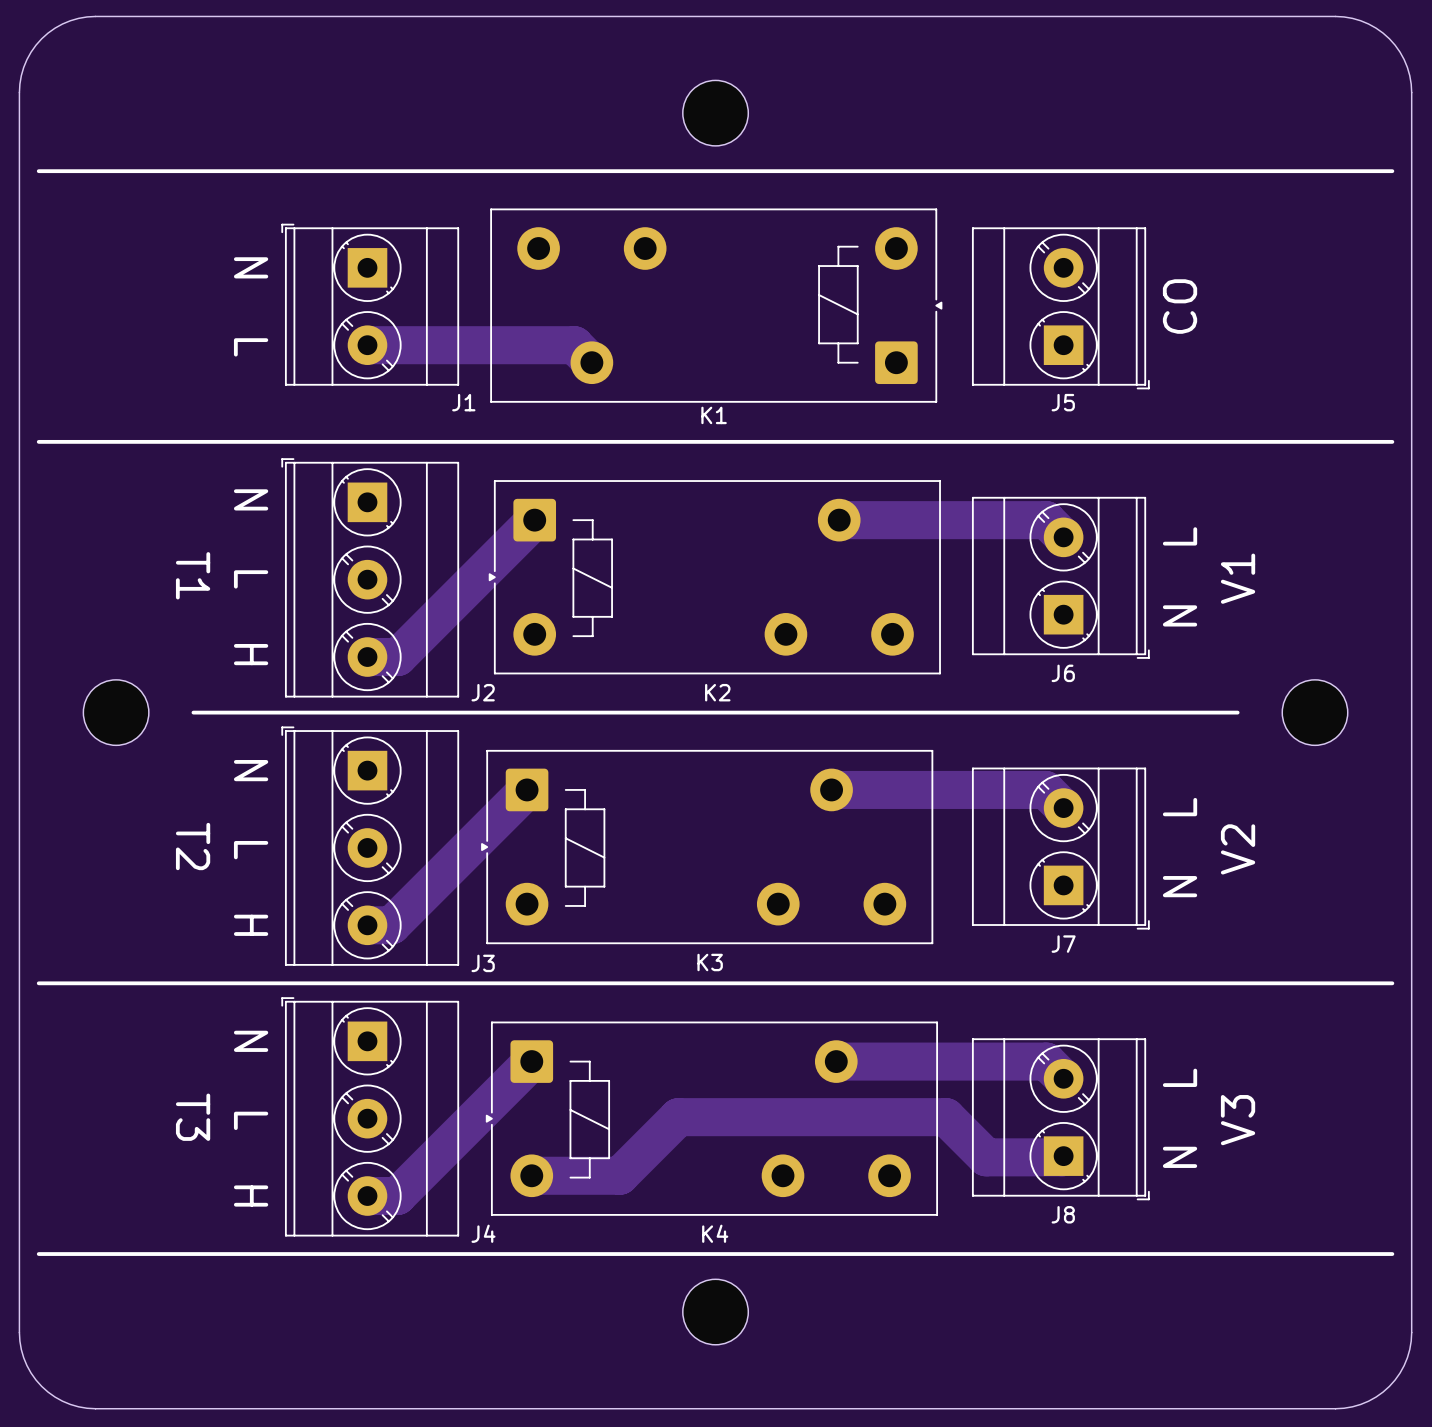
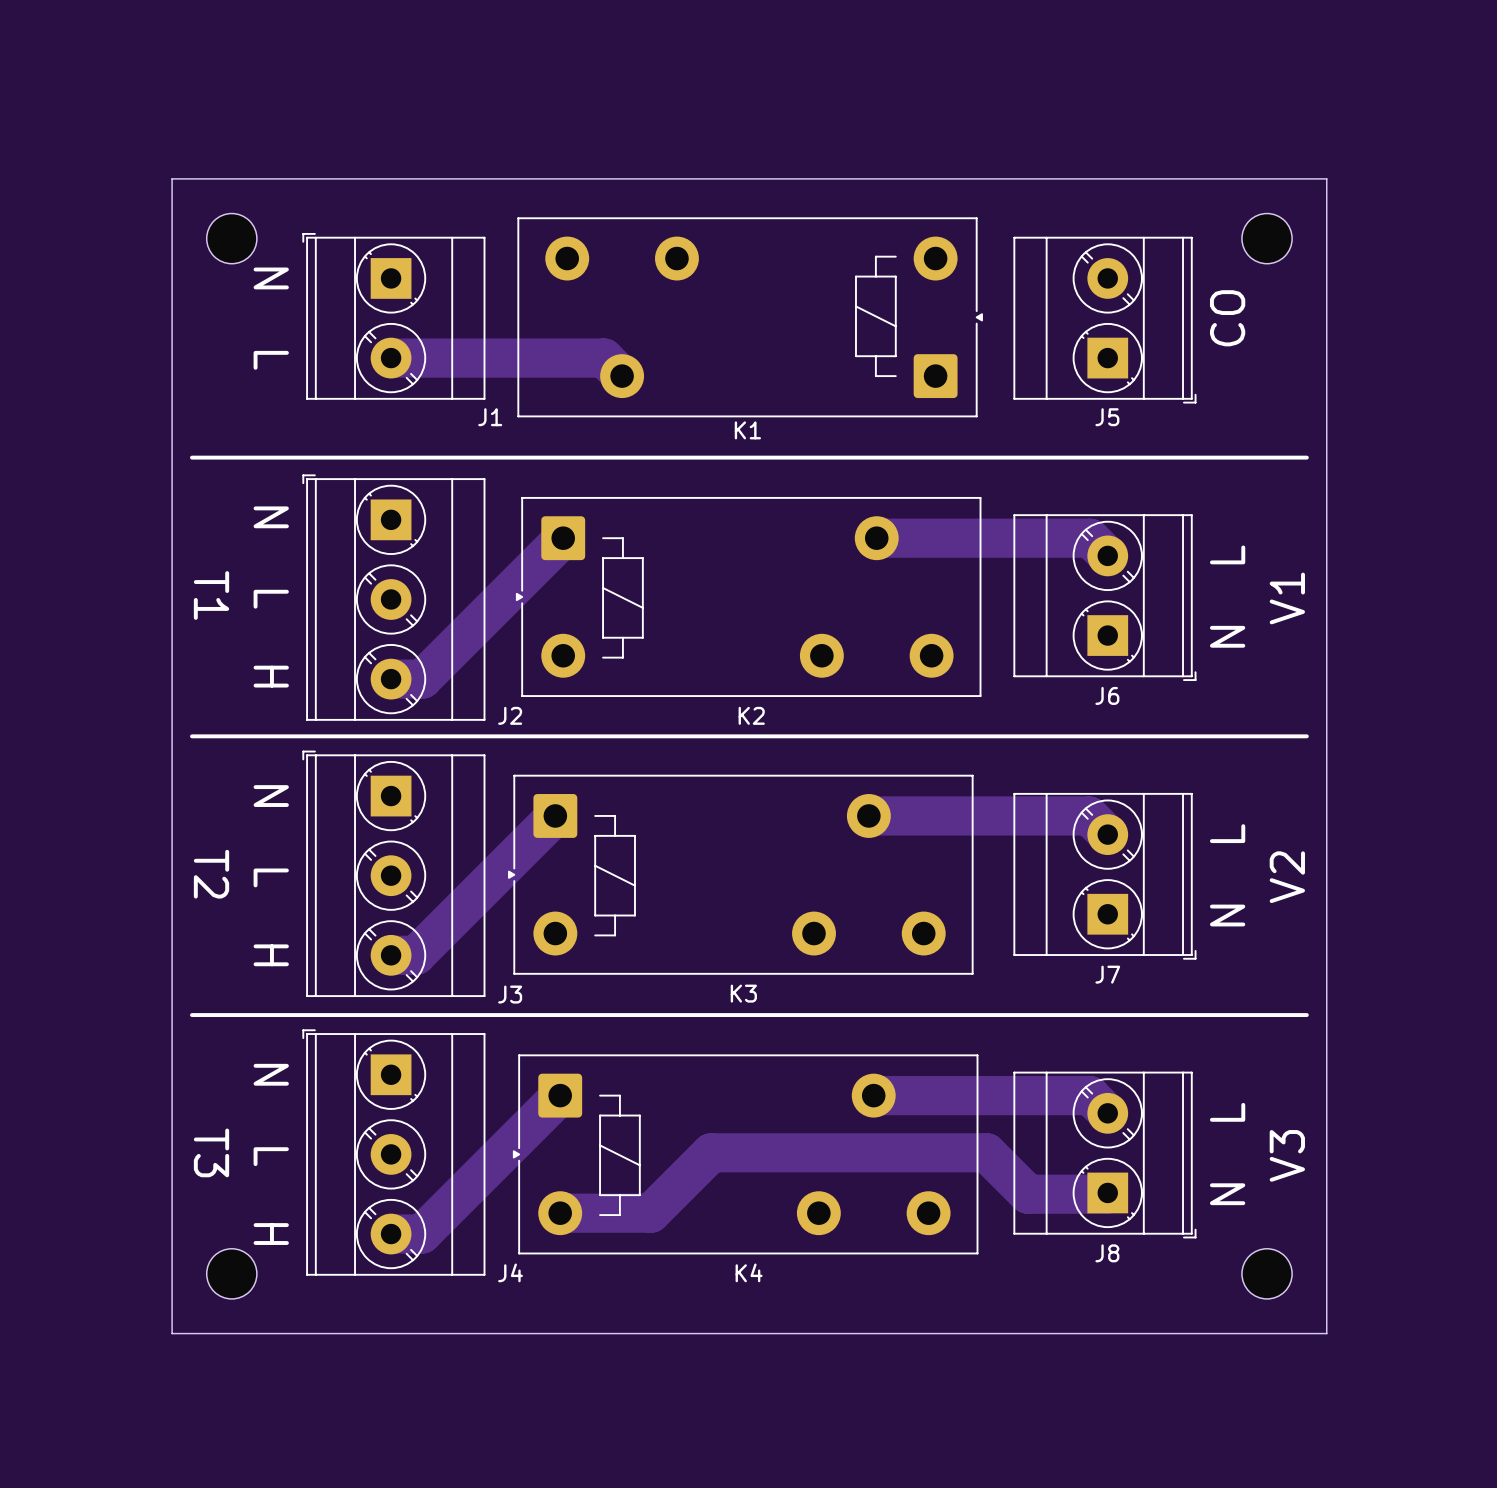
board edge: (95, 16) (1335, 16) (1360, 20) (1376, 28) (1389, 38) (1404, 59) (1409, 75) (1411, 92) (1411, 1332) (1407, 1357) (1400, 1373) (1389, 1386) (1376, 1397) (1360, 1404) (1335, 1408) (95, 1408) (78, 1406) (62, 1401) (41, 1386) (31, 1373) (23, 1357) (19, 1332) (19, 92) (21, 75) (26, 59) (41, 38) (62, 24) (78, 18) (95, 16) -> (172, 178) (172, 1333) (1326, 1333) (1326, 178) (172, 178)
part: (715, 113) -> none
line: (38, 171) (1392, 171) -> none
part: none -> (231, 238)
part: none -> (1267, 238)
line: (38, 441) (174, 441) -> none
line: (1256, 441) (1392, 441) -> none
part: (116, 712) -> none
line: none -> (191, 736) (211, 736)
line: none -> (1286, 736) (1306, 736)
part: (1315, 712) -> none
line: (38, 983) (174, 983) -> none
line: (1256, 983) (1392, 983) -> none
part: none -> (231, 1273)
part: none -> (1267, 1273)
line: (38, 1254) (1392, 1254) -> none
part: (715, 1312) -> none

